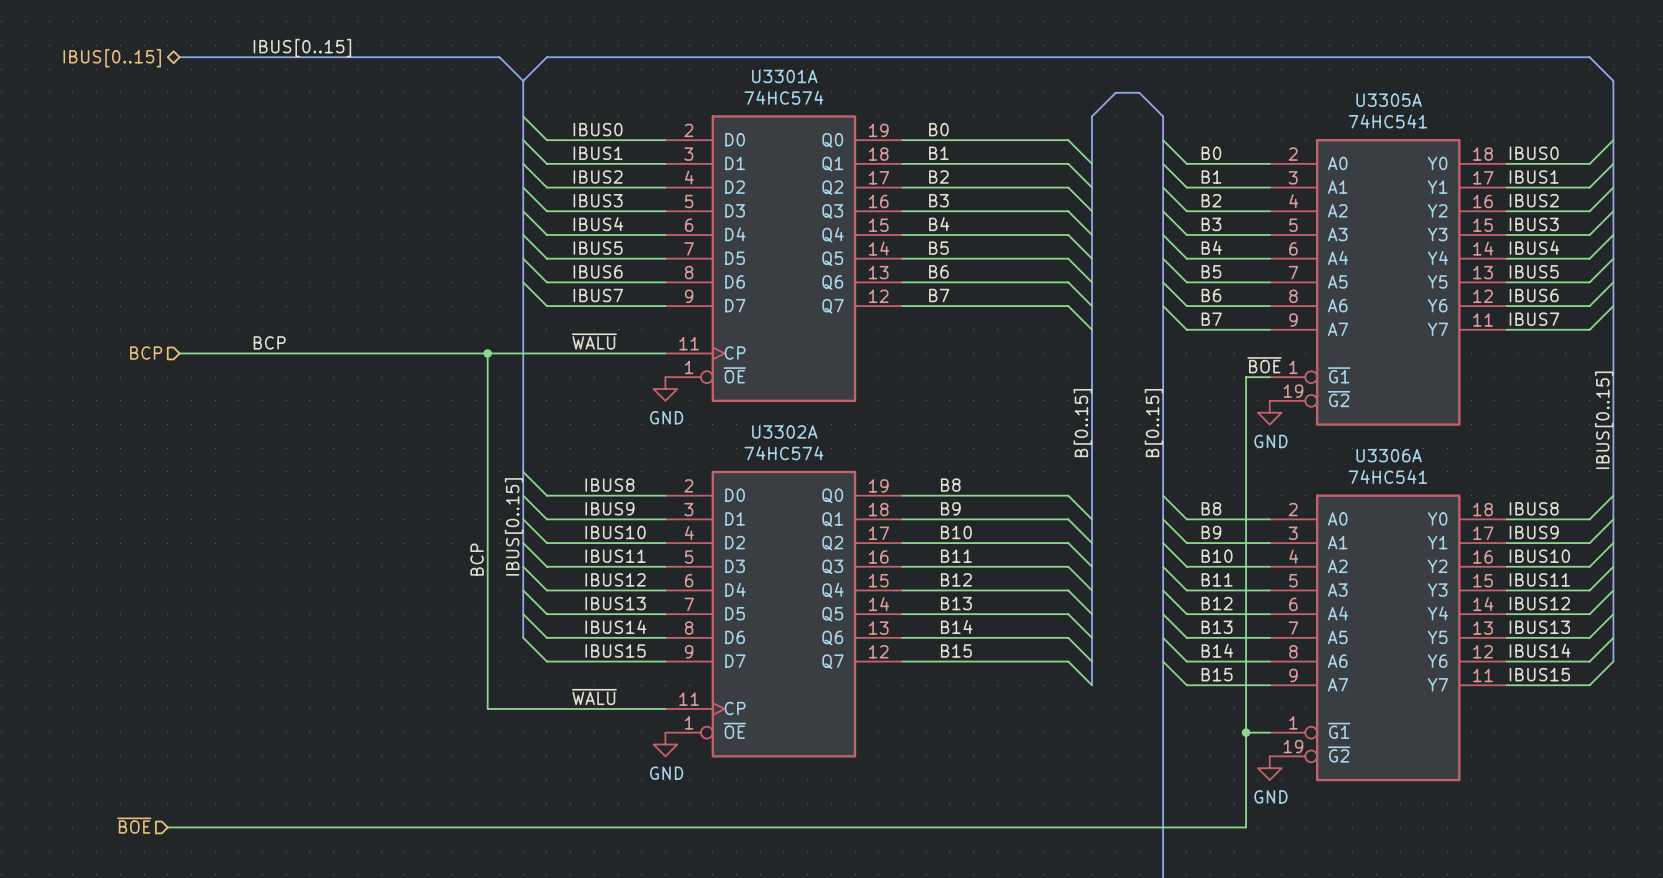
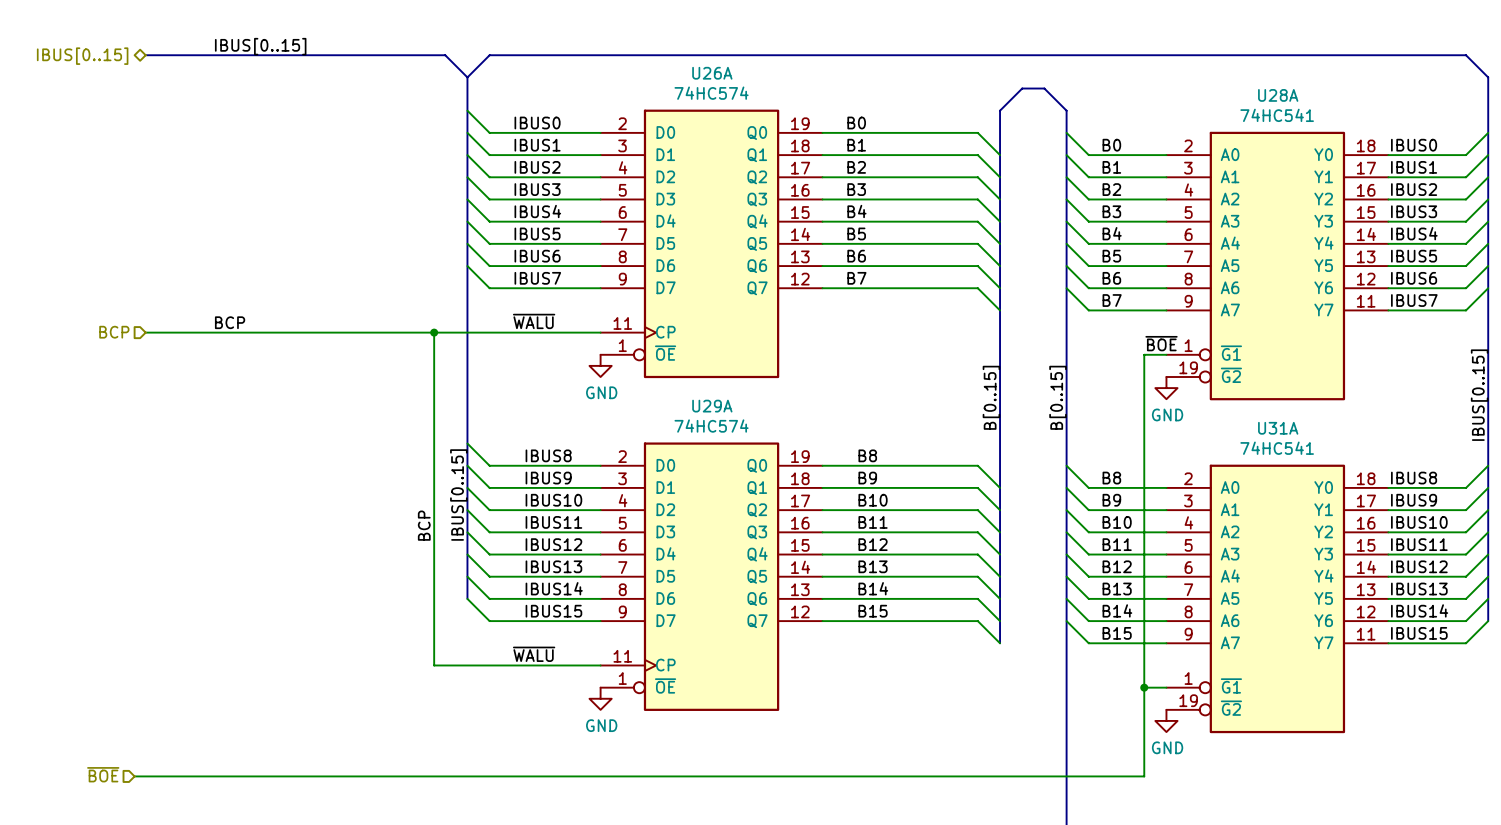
U3301A name: U3301A (784, 76) -> U26A (712, 73)
U3305A name: U3305A (1389, 100) -> U28A (1278, 95)
U3302A name: U3302A (784, 431) -> U29A (712, 406)
U3306A name: U3306A (1389, 455) -> U31A (1278, 428)

